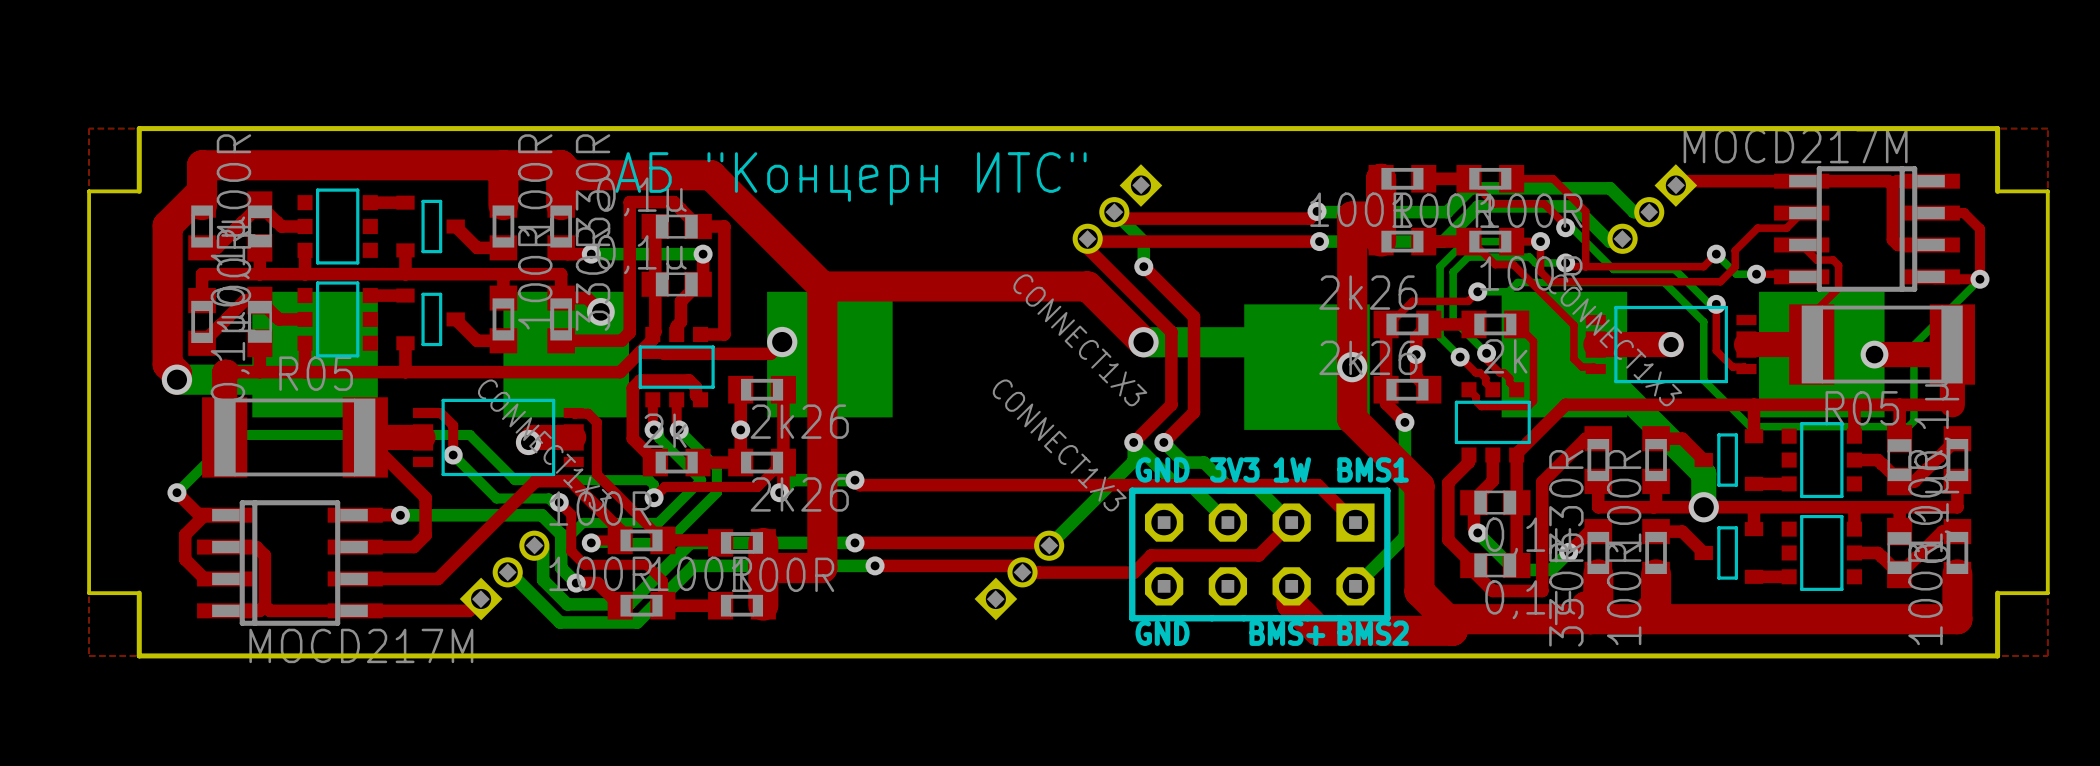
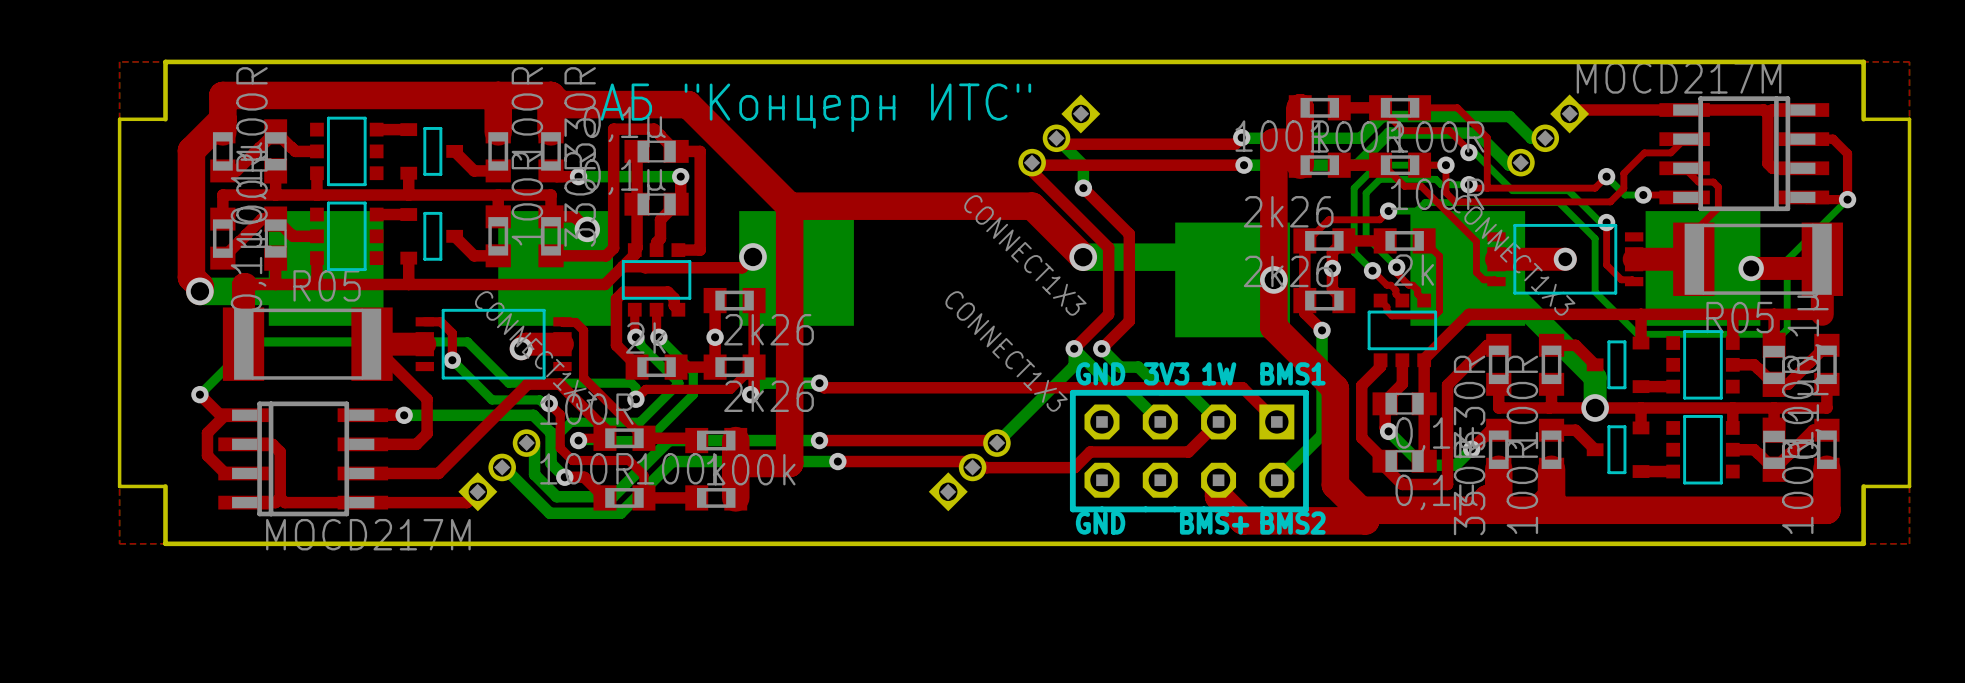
part value: 100R (700, 573) -> 100k (681, 468)
part value: 100R (783, 574) -> 100k (751, 469)

